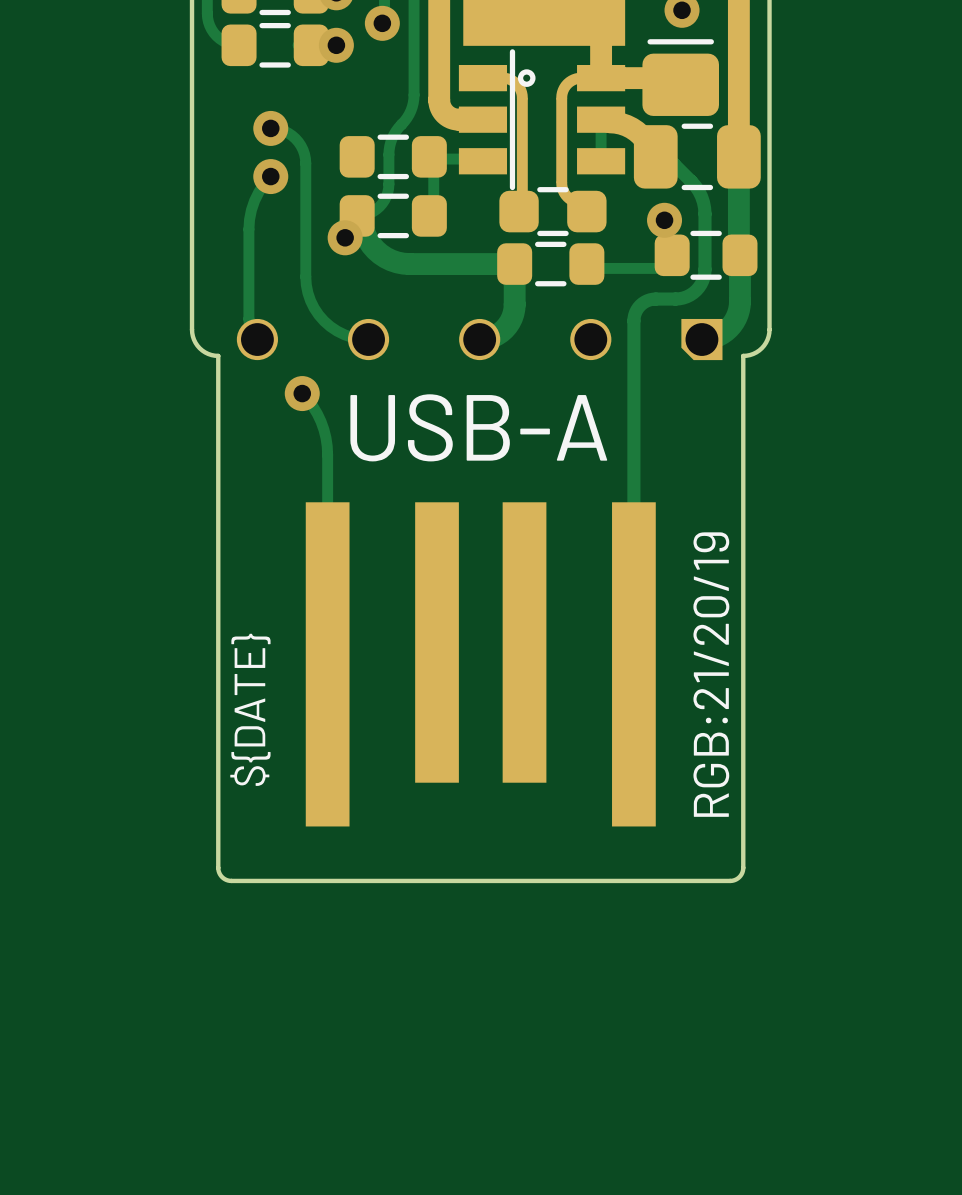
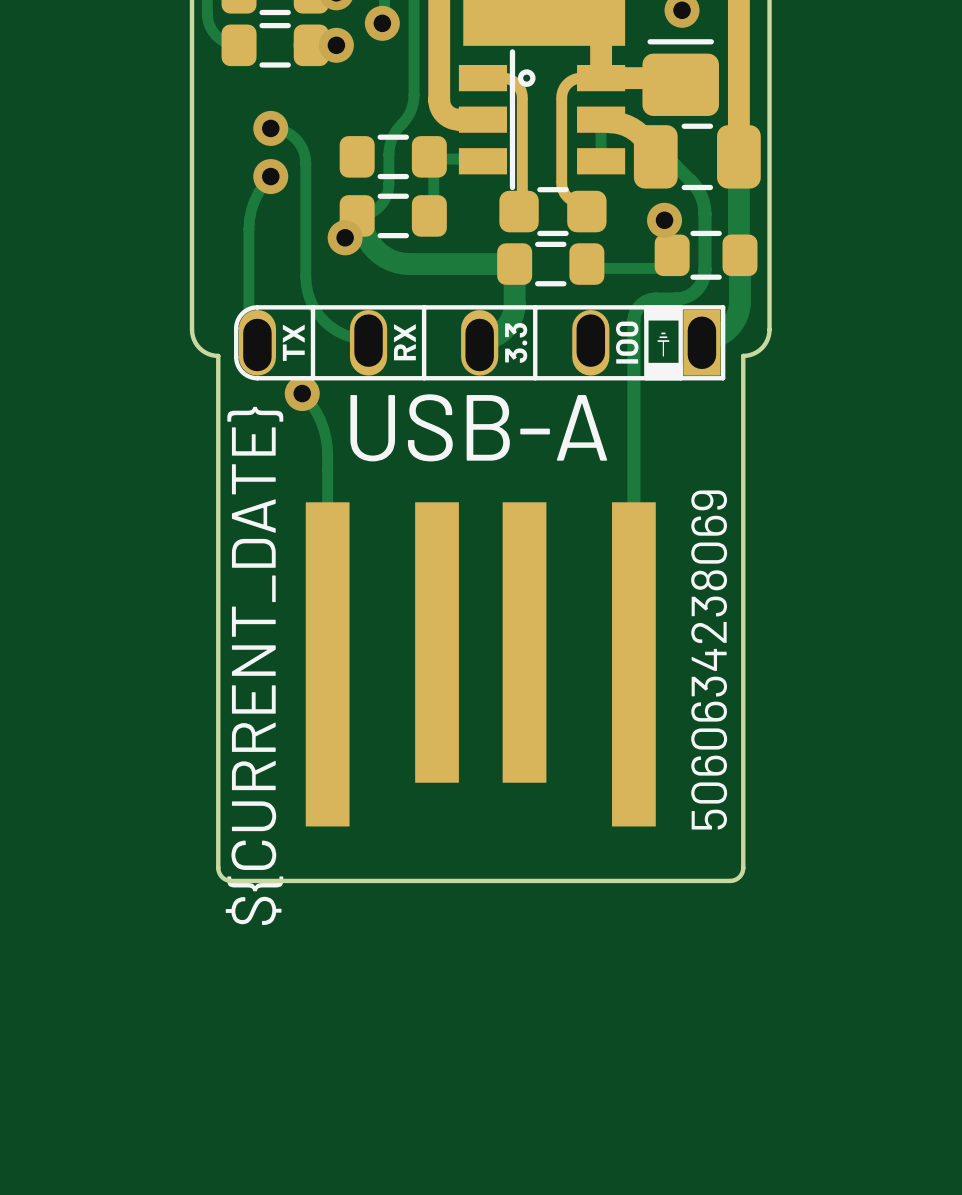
part footprint: [236, 318, 723, 361] -> [234, 305, 726, 381]
text: RGB:21/20/19 (711, 674) -> 5060634238069 (709, 659)
text: ${DATE} (250, 709) -> ${CURRENT_DATE} (254, 665)

